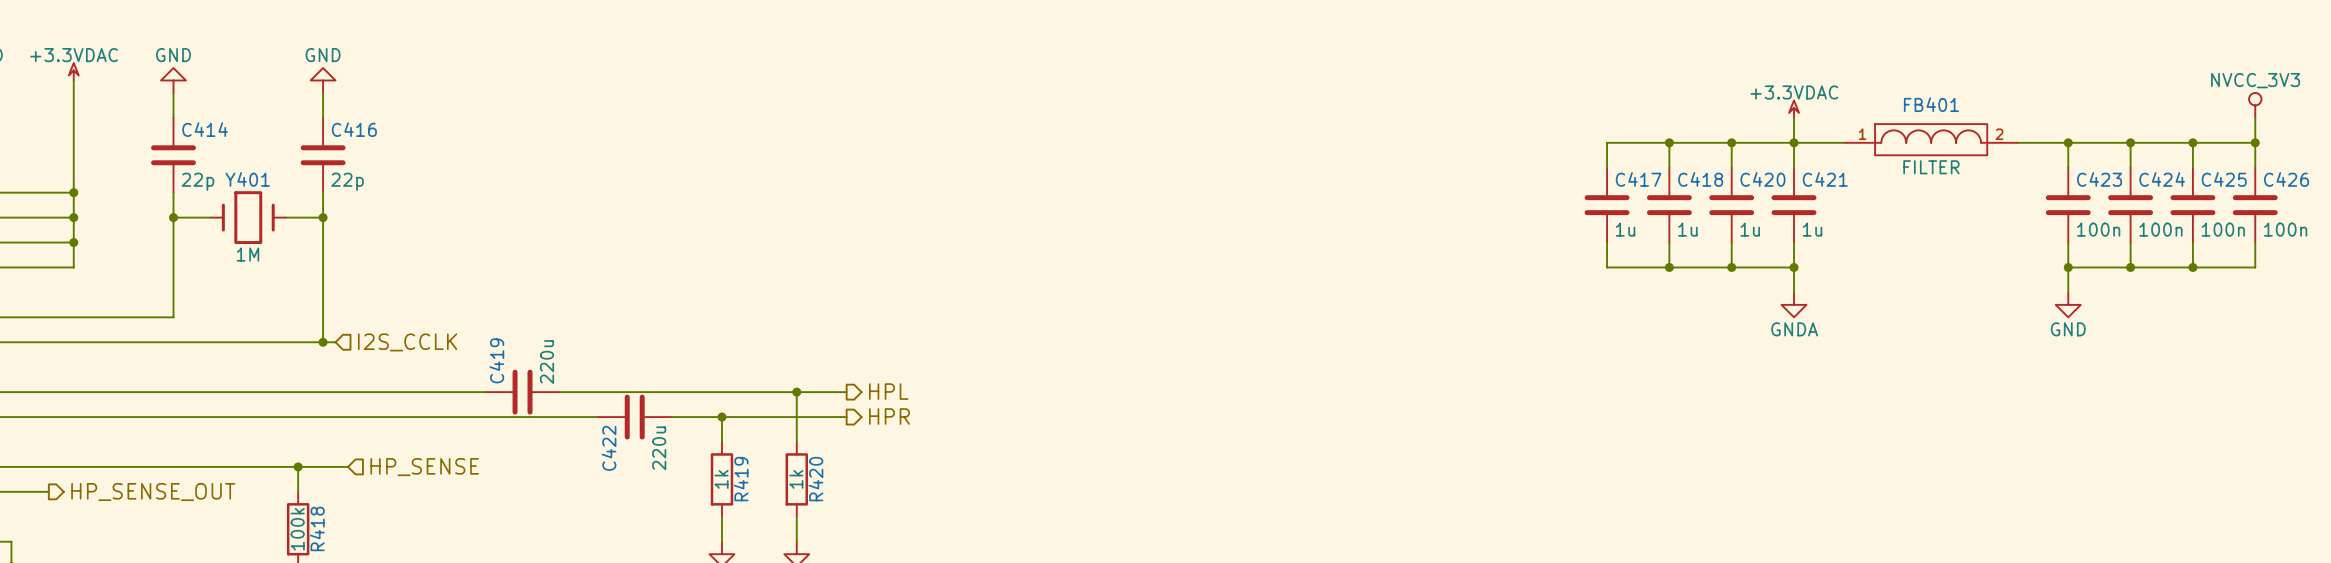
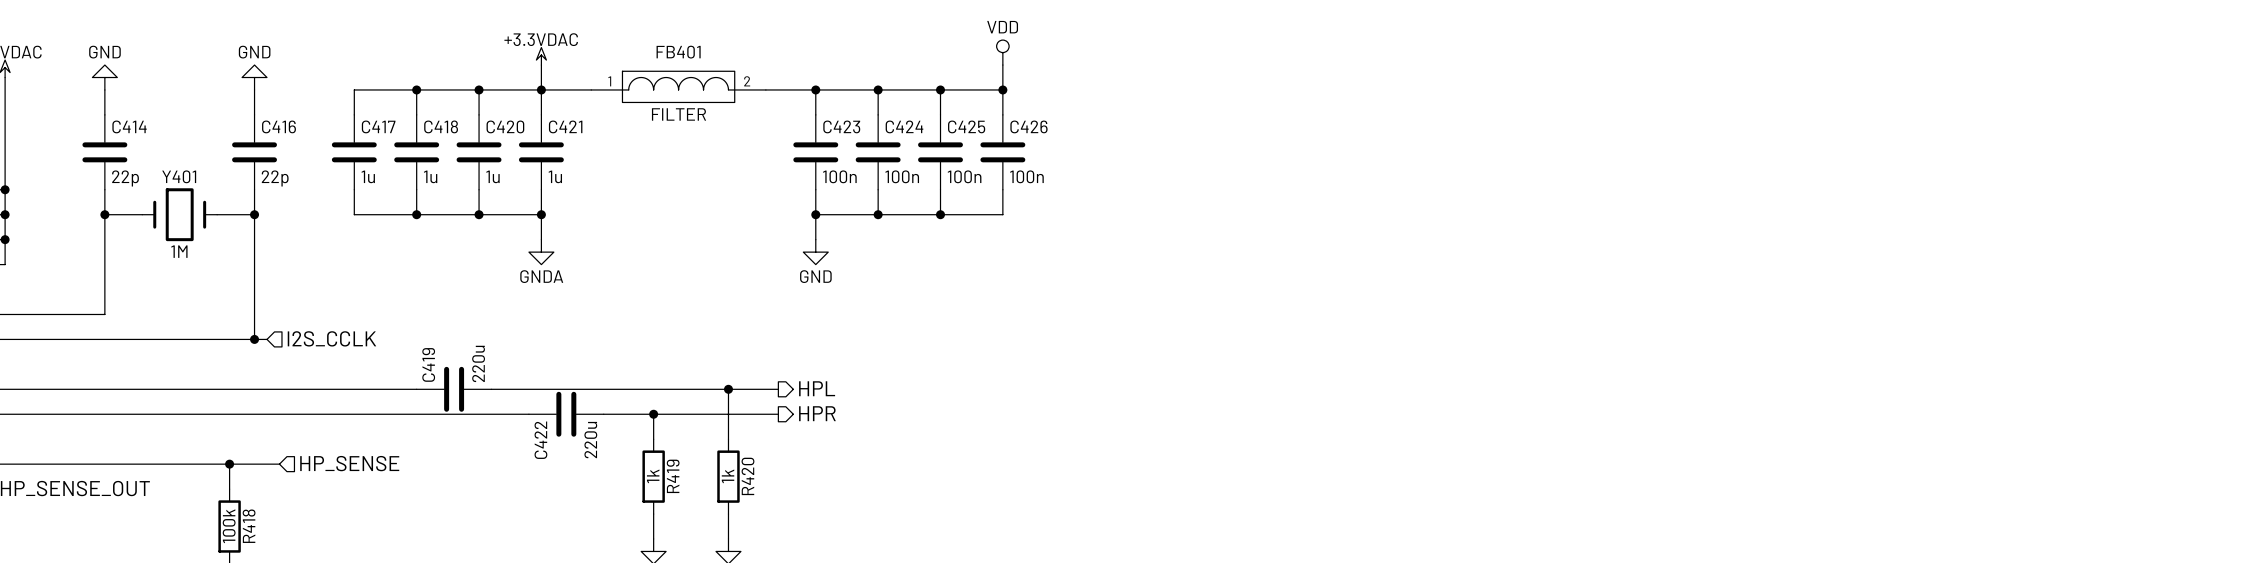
power symbol: none -> VDD (1002, 52)
power symbol: none -> +3.3VDAC (541, 56)
wire: none -> (541, 65) (541, 114)
wire: none -> (1002, 65) (1002, 114)
wire: none -> (416, 89) (416, 114)
junction: none -> (416, 89)
wire: none -> (479, 89) (479, 114)
junction: none -> (479, 89)
junction: none -> (541, 89)
wire: none -> (591, 89) (354, 89) (354, 114)
wire: none -> (765, 89) (1002, 89)
wire: none -> (815, 89) (815, 114)
junction: none -> (815, 89)
wire: none -> (878, 89) (878, 114)
junction: none -> (878, 89)
wire: none -> (940, 89) (940, 114)
junction: none -> (940, 89)
junction: none -> (1002, 89)
power symbol: NVCC_3V3 (2255, 105) -> none
power symbol: +3.3VDAC (1794, 109) -> none
wire: (1794, 117) (1794, 167) -> none
wire: (2255, 117) (2255, 167) -> none
FB401 position: (1931, 139) -> (678, 86)
wire: (1669, 142) (1669, 167) -> none
junction: (1669, 142) -> none
wire: (1731, 142) (1731, 167) -> none
junction: (1731, 142) -> none
junction: (1794, 142) -> none
wire: (1843, 142) (1607, 142) (1607, 167) -> none
wire: (2018, 142) (2255, 142) -> none
wire: (2068, 142) (2068, 167) -> none
junction: (2068, 142) -> none
wire: (2130, 142) (2130, 167) -> none
junction: (2130, 142) -> none
wire: (2192, 142) (2192, 167) -> none
junction: (2192, 142) -> none
junction: (2255, 142) -> none
wire: none -> (354, 189) (354, 214) (541, 214)
wire: none -> (416, 189) (416, 214)
wire: none -> (479, 189) (479, 214)
wire: none -> (541, 189) (541, 239)
wire: none -> (815, 189) (815, 239)
wire: none -> (878, 189) (878, 214)
wire: none -> (940, 189) (940, 214)
wire: none -> (1002, 189) (1002, 214) (815, 214)
C417 position: (1607, 205) -> (354, 152)
C418 position: (1669, 205) -> (416, 152)
C420 position: (1731, 205) -> (479, 152)
C421 position: (1794, 205) -> (541, 152)
C423 position: (2068, 205) -> (815, 152)
C424 position: (2130, 205) -> (878, 152)
C425 position: (2192, 205) -> (940, 152)
C426 position: (2255, 205) -> (1002, 152)
junction: none -> (416, 214)
junction: none -> (479, 214)
junction: none -> (541, 214)
junction: none -> (815, 214)
junction: none -> (878, 214)
junction: none -> (940, 214)
wire: (1607, 242) (1607, 267) (1794, 267) -> none
wire: (1669, 242) (1669, 267) -> none
wire: (1731, 242) (1731, 267) -> none
wire: (1794, 242) (1794, 292) -> none
wire: (2068, 242) (2068, 292) -> none
wire: (2130, 242) (2130, 267) -> none
wire: (2192, 242) (2192, 267) -> none
wire: (2255, 242) (2255, 267) (2068, 267) -> none
power symbol: none -> GNDA (541, 252)
power symbol: none -> GND (815, 252)
junction: (1669, 267) -> none
junction: (1731, 267) -> none
junction: (1794, 267) -> none
junction: (2068, 267) -> none
junction: (2130, 267) -> none
junction: (2192, 267) -> none
power symbol: GNDA (1794, 304) -> none
power symbol: GND (2068, 304) -> none

